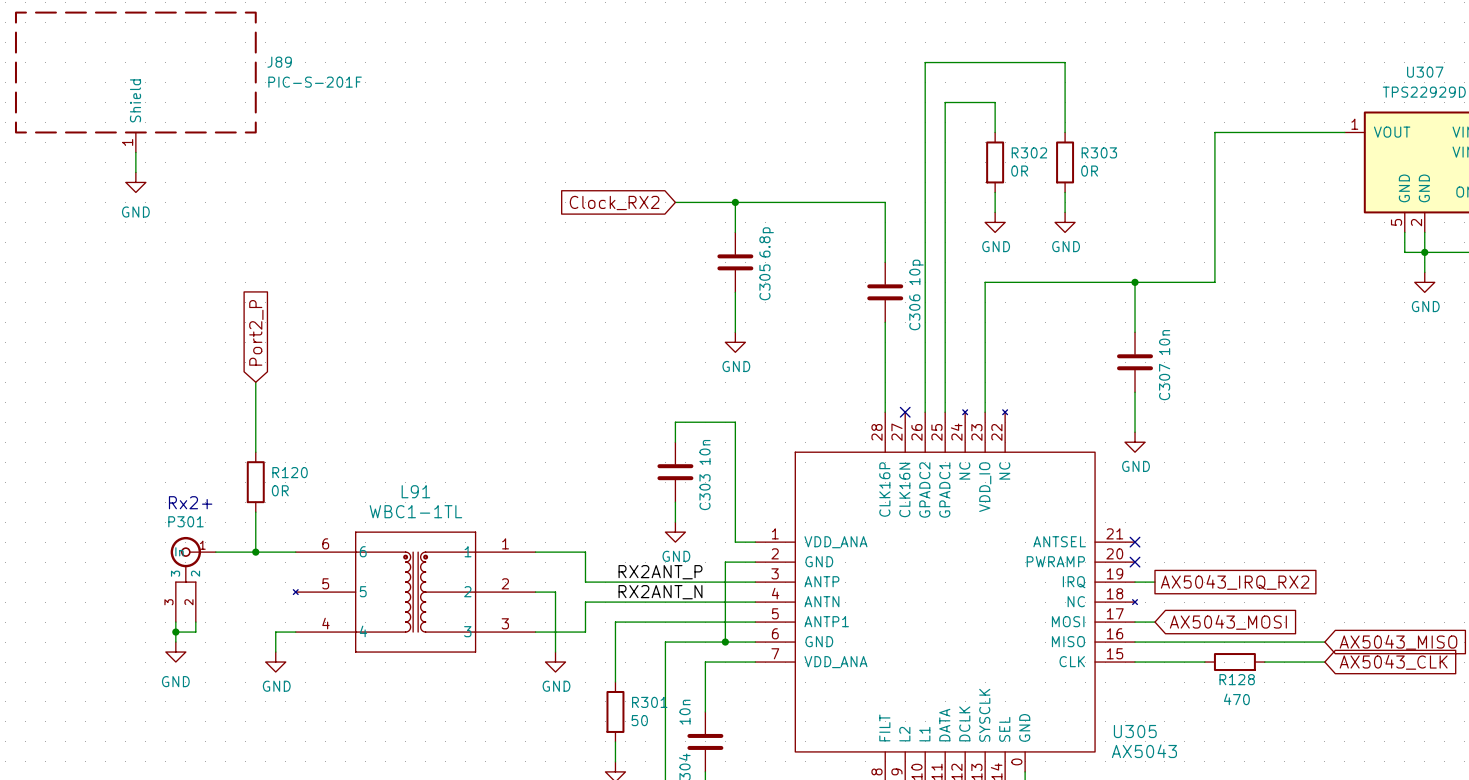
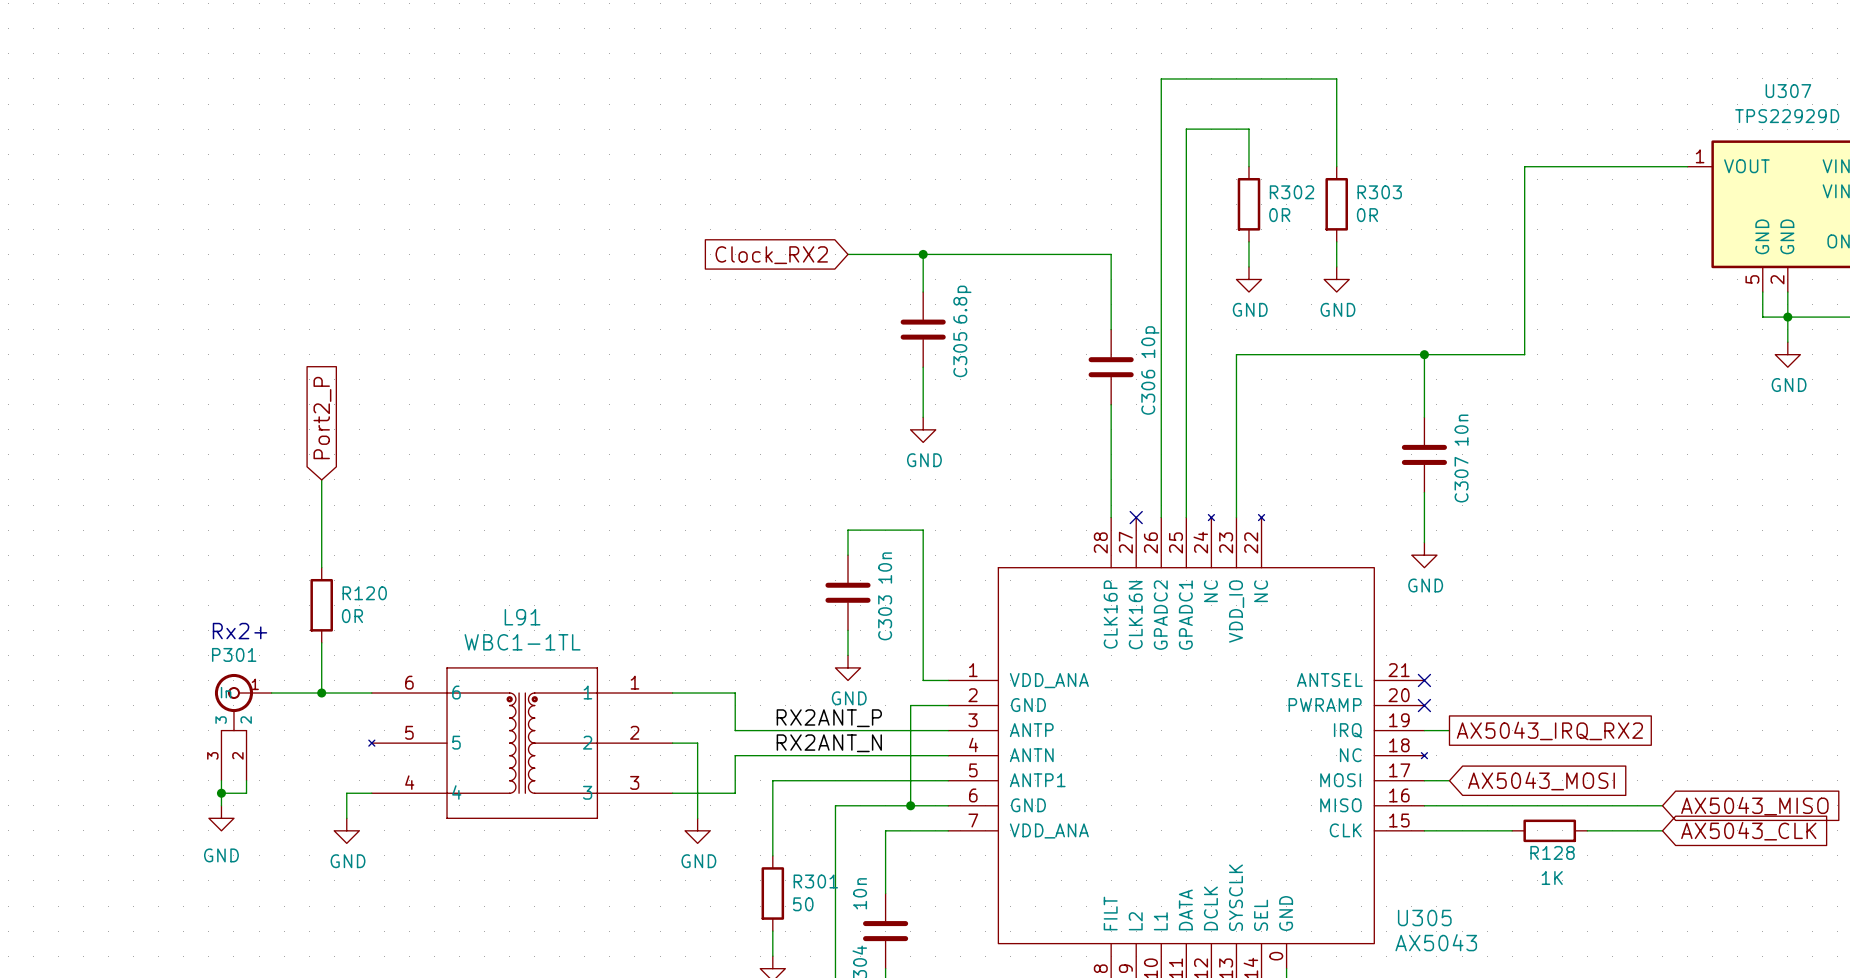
J89: PIC-S-201F (135, 82) -> none
wire: (135, 152) (135, 172) -> none
power symbol: GND (135, 182) -> none
R128 value: 470 (1236, 699) -> 1K (1552, 877)

